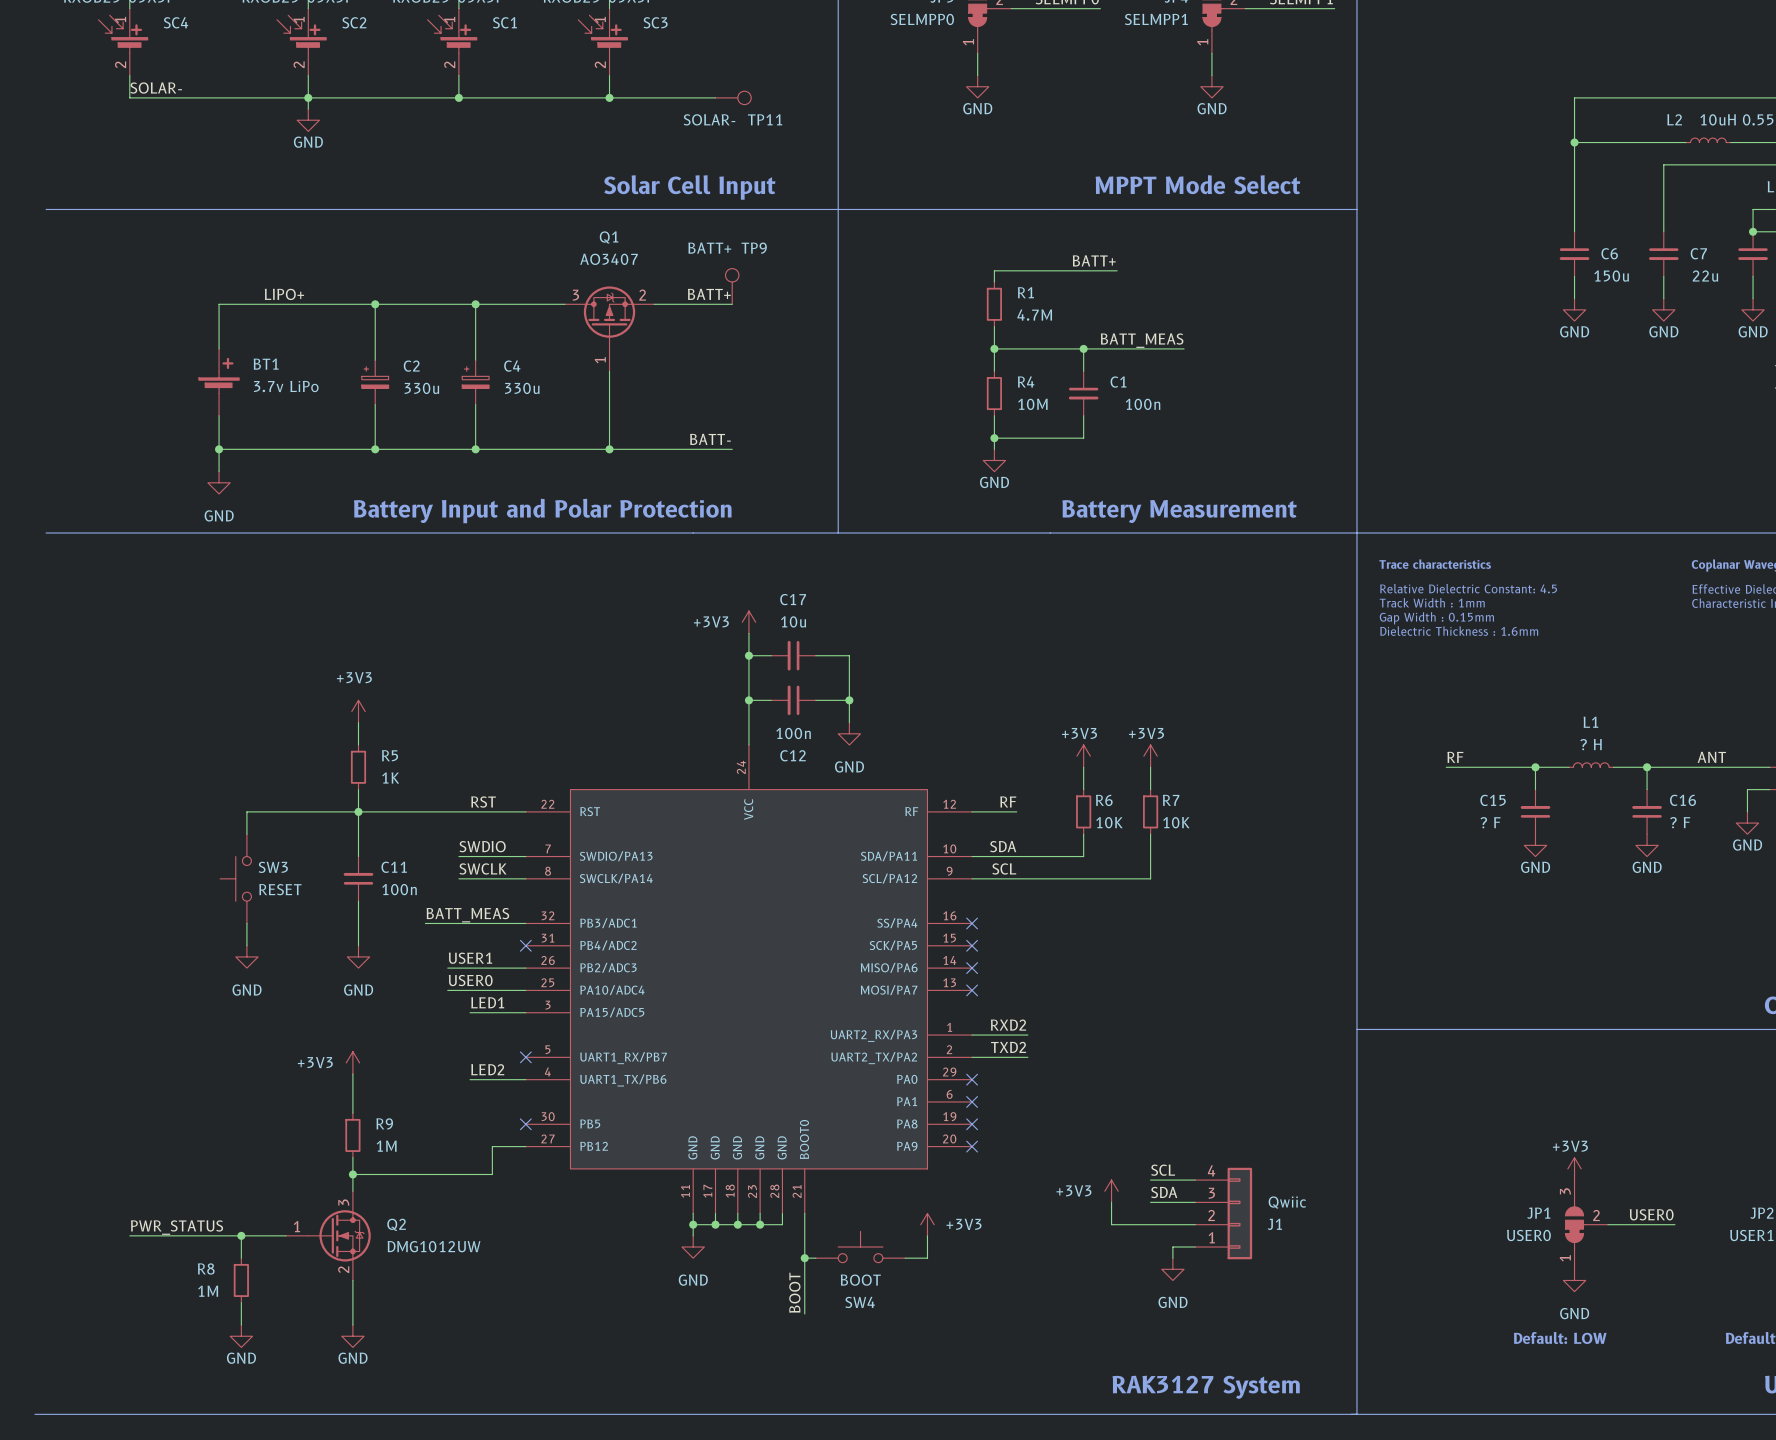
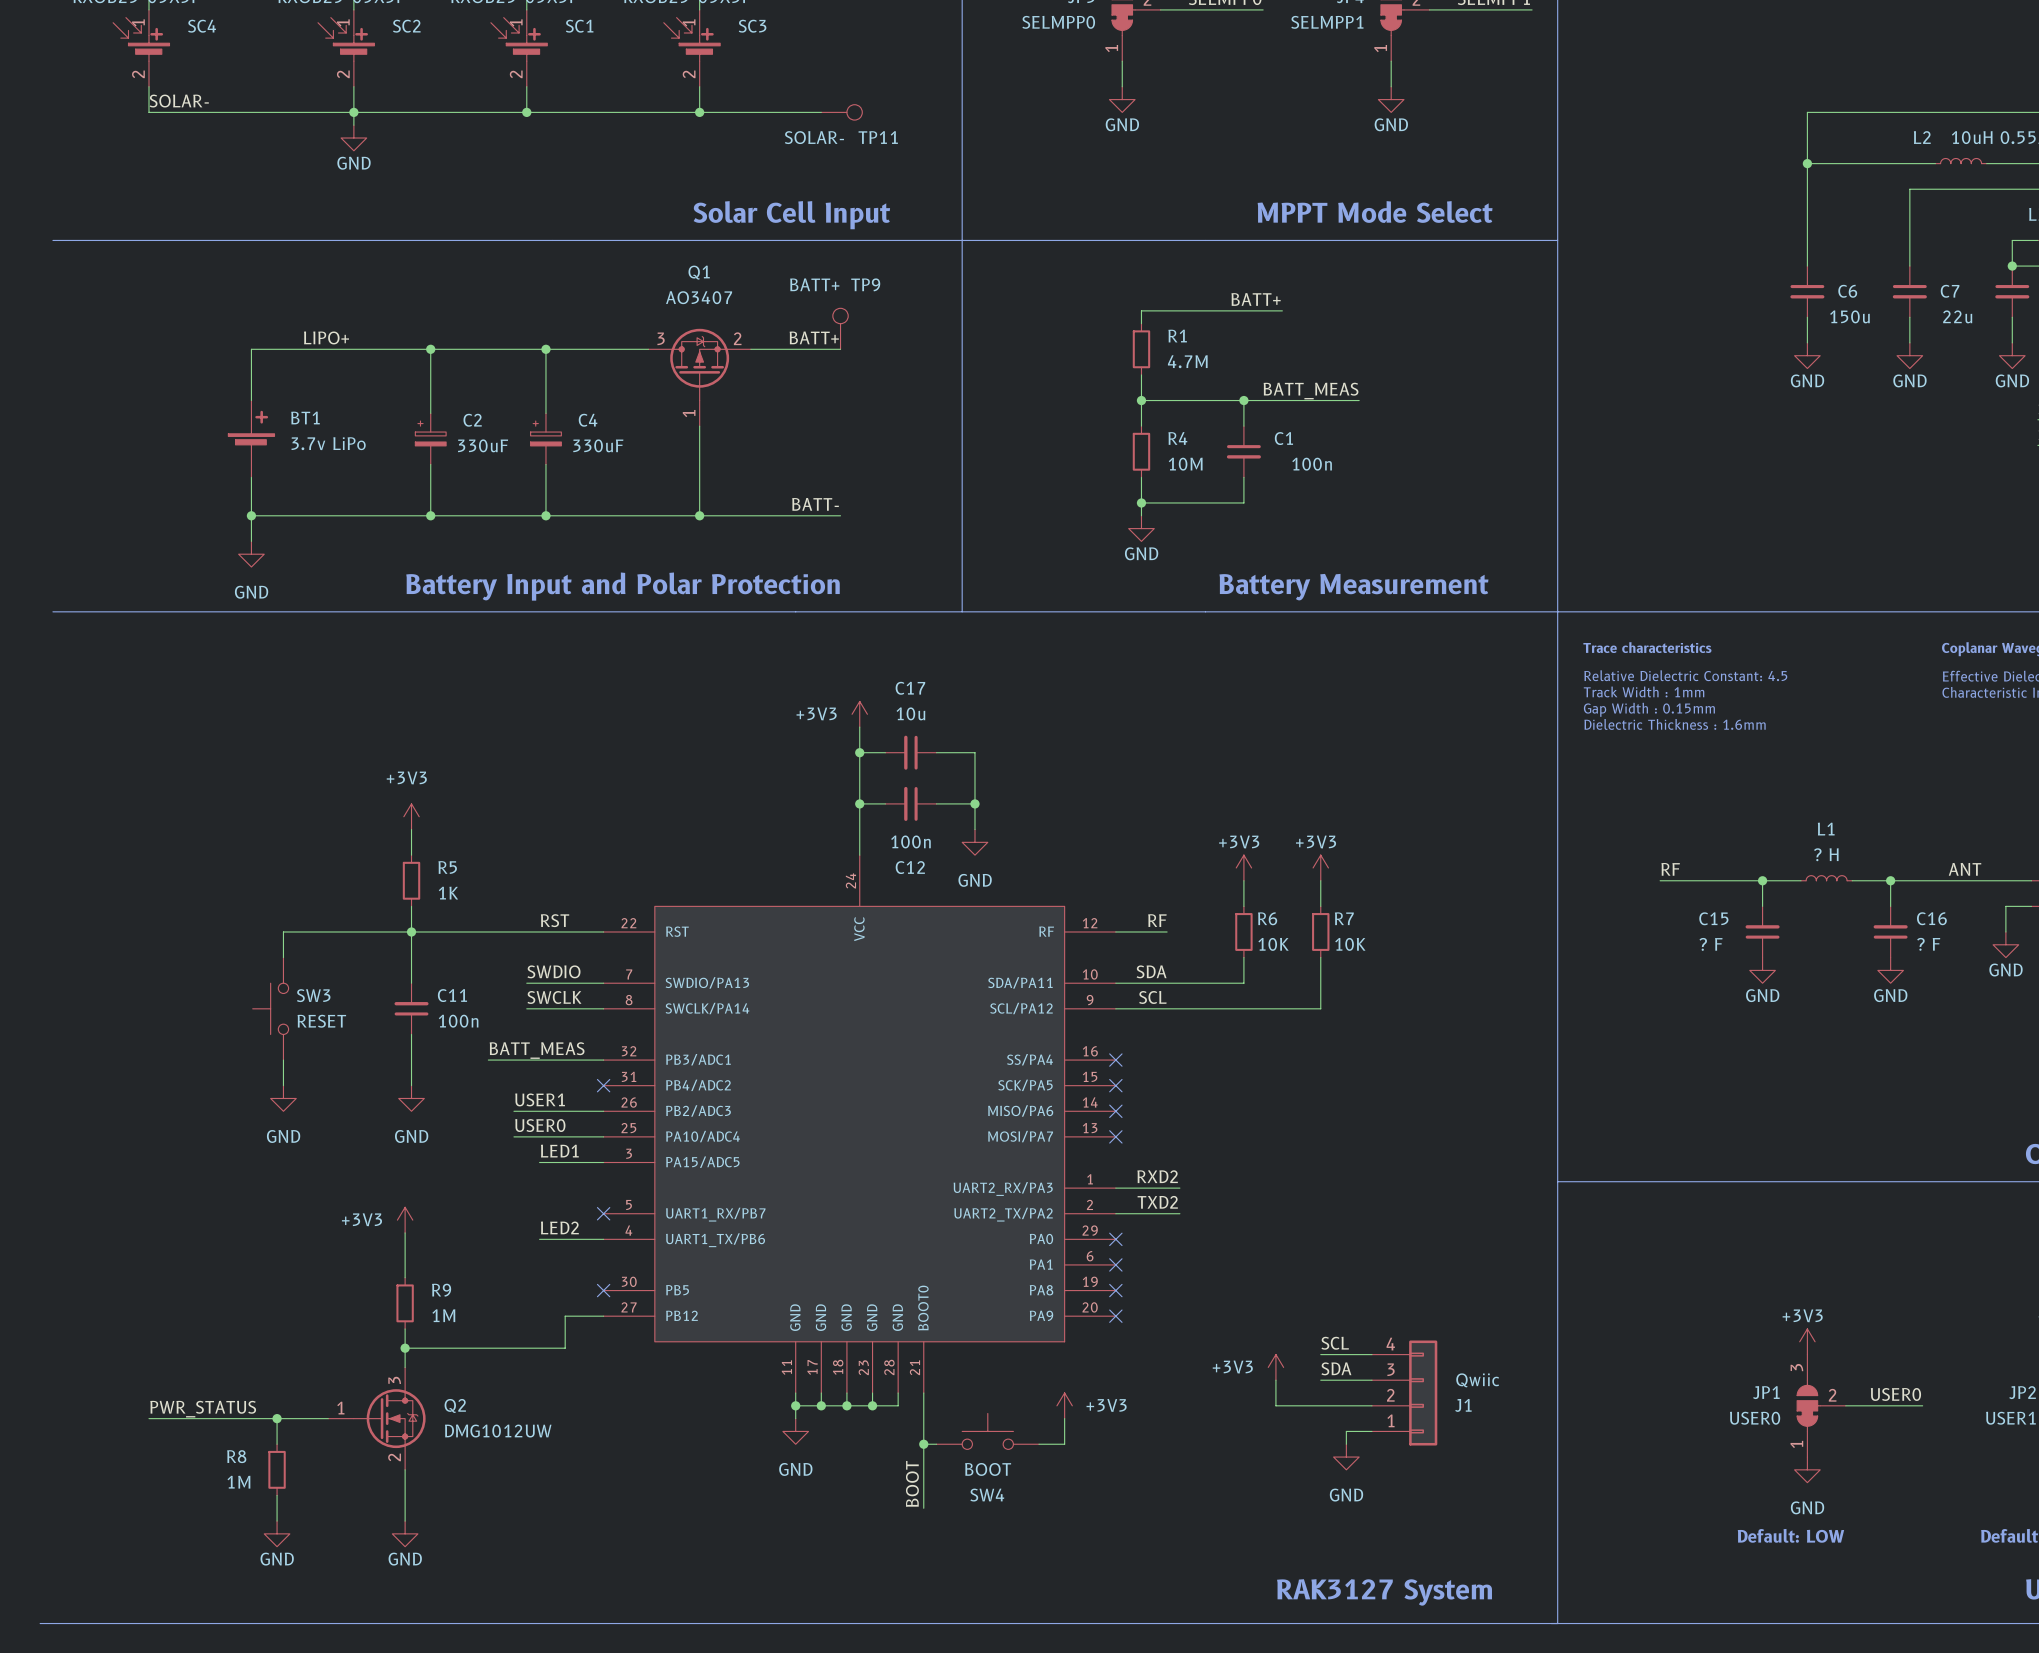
C2 value: 330u (421, 388) -> 330uF (483, 445)
C4 value: 330u (522, 388) -> 330uF (598, 445)

